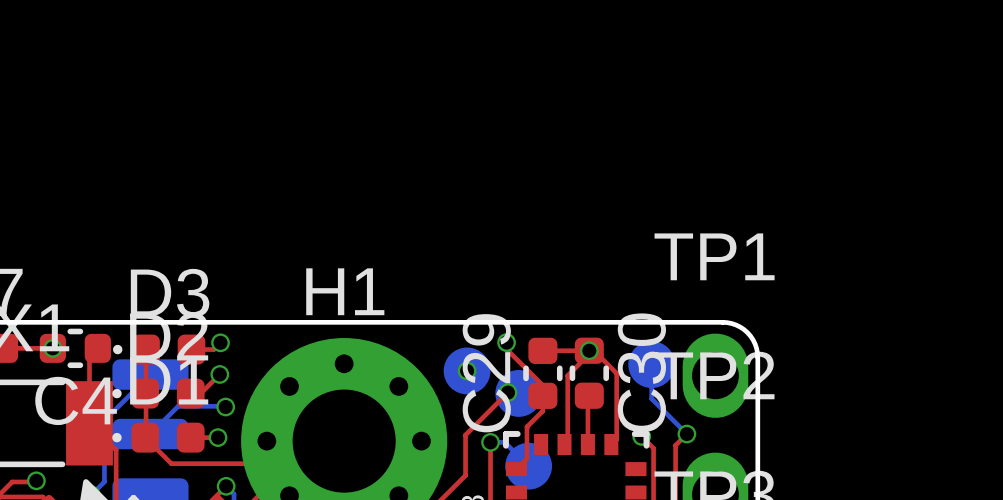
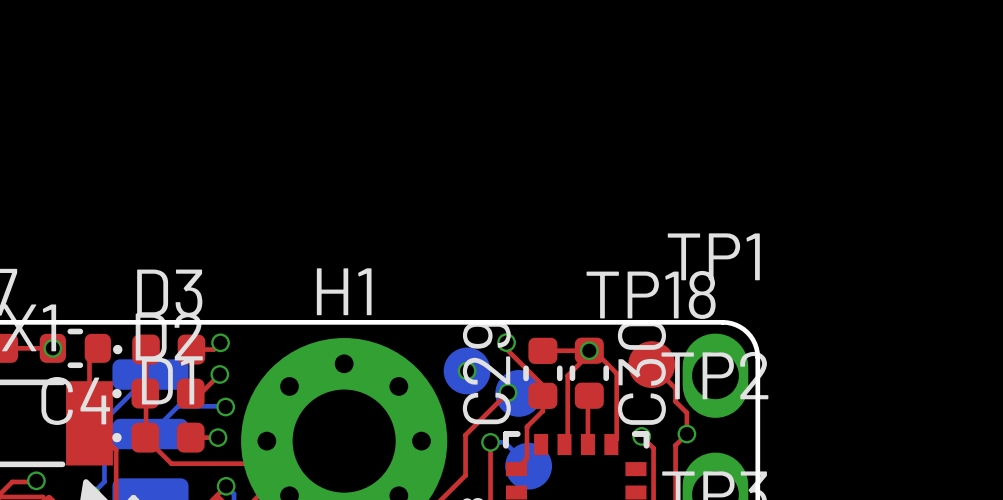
top track: none -> (651, 364) (675, 388) (675, 401) (686, 412) (686, 434)
bottom track: (651, 364) (651, 398) (686, 434) -> none
TP18 side: bottom (651, 364) -> top (651, 364)

